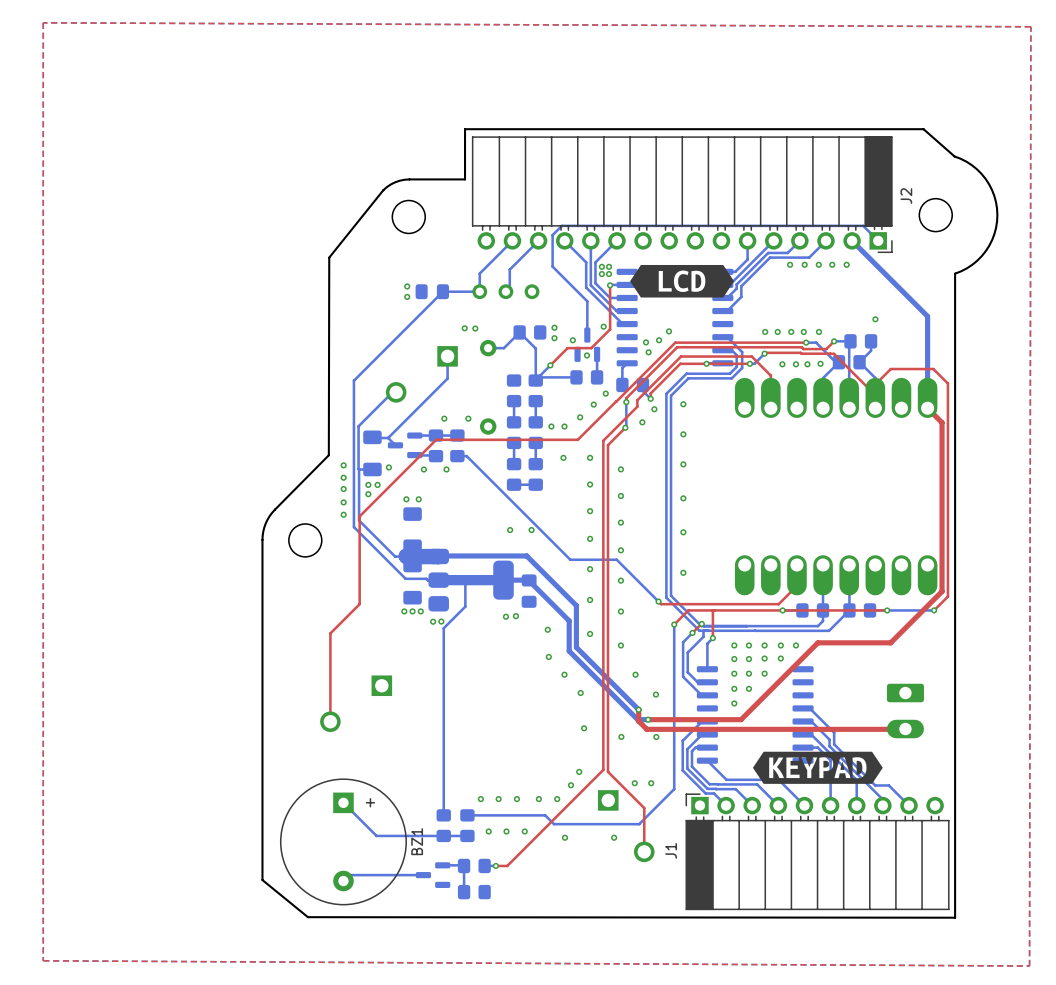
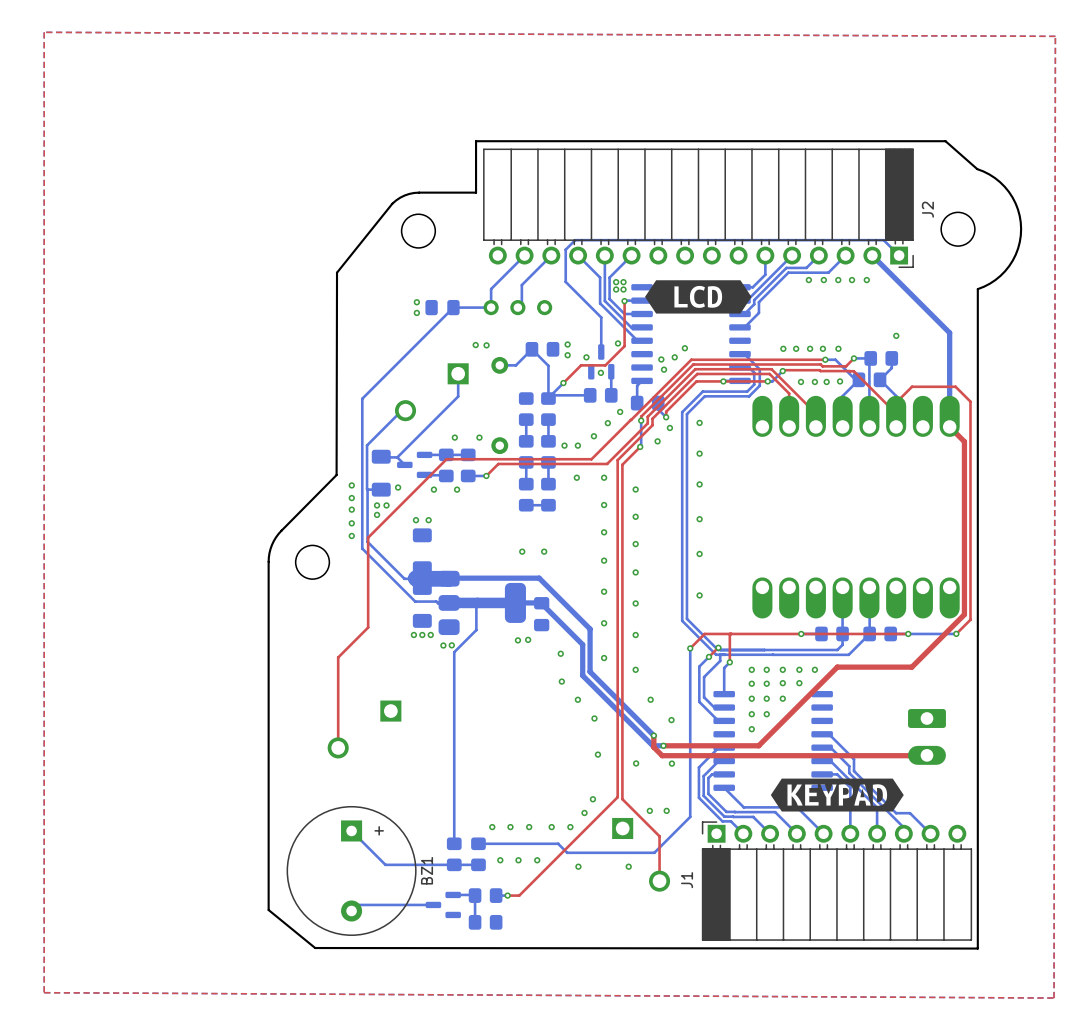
top track: none -> (815, 413) (771, 369) (695, 369) (647, 416) (647, 423) (607, 463) (498, 463) (486, 475)
bottom track: (466, 456) (570, 559) (616, 559) (658, 601) -> (477, 475) (486, 475)
via: none -> (486, 475)
top track: (796, 564) (796, 585) (778, 604) (661, 604) (658, 601) -> none
via: (658, 601) -> none

